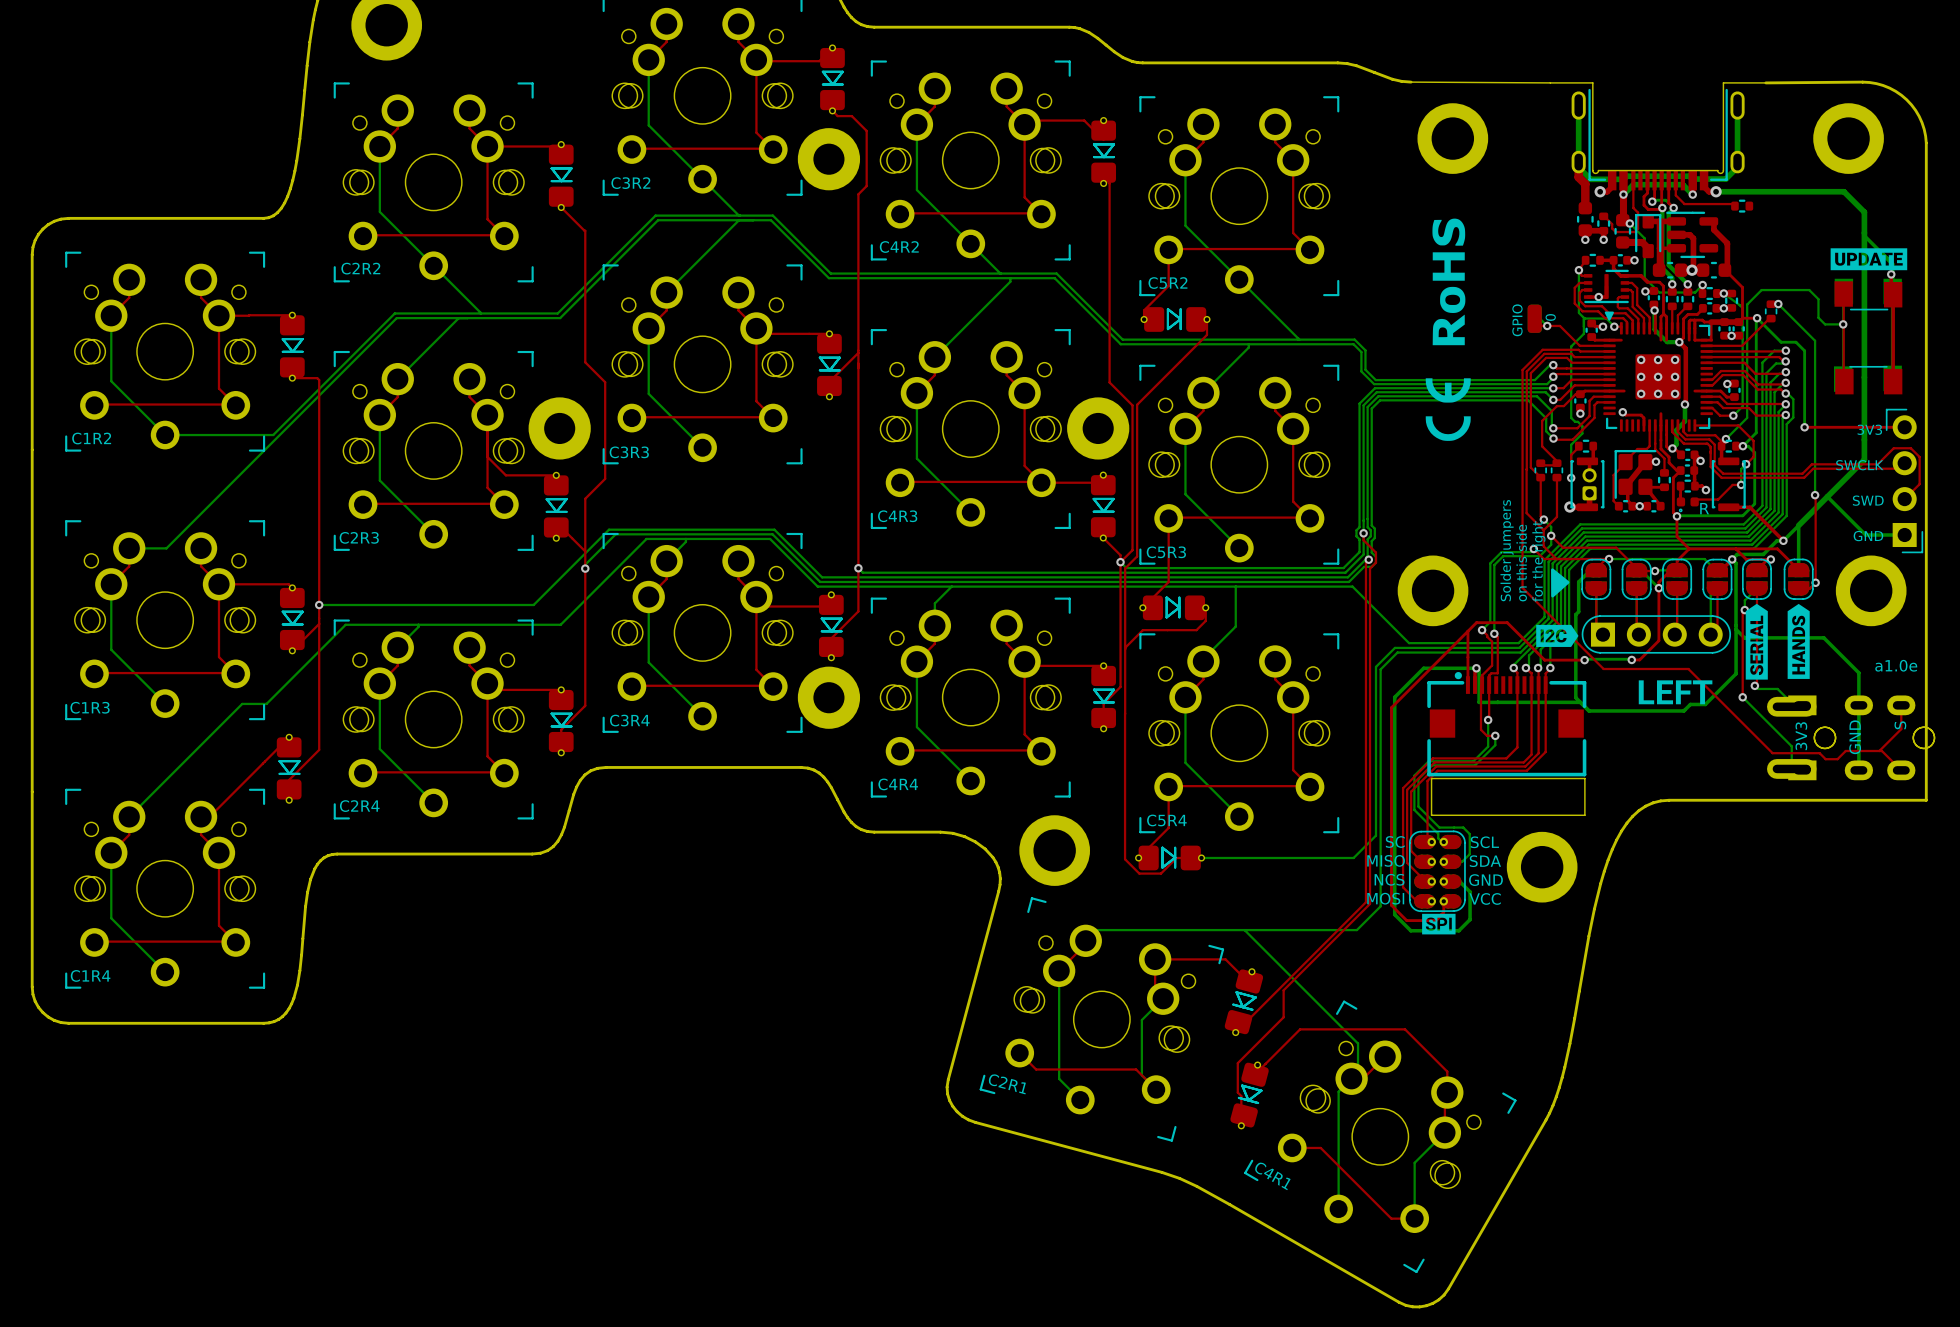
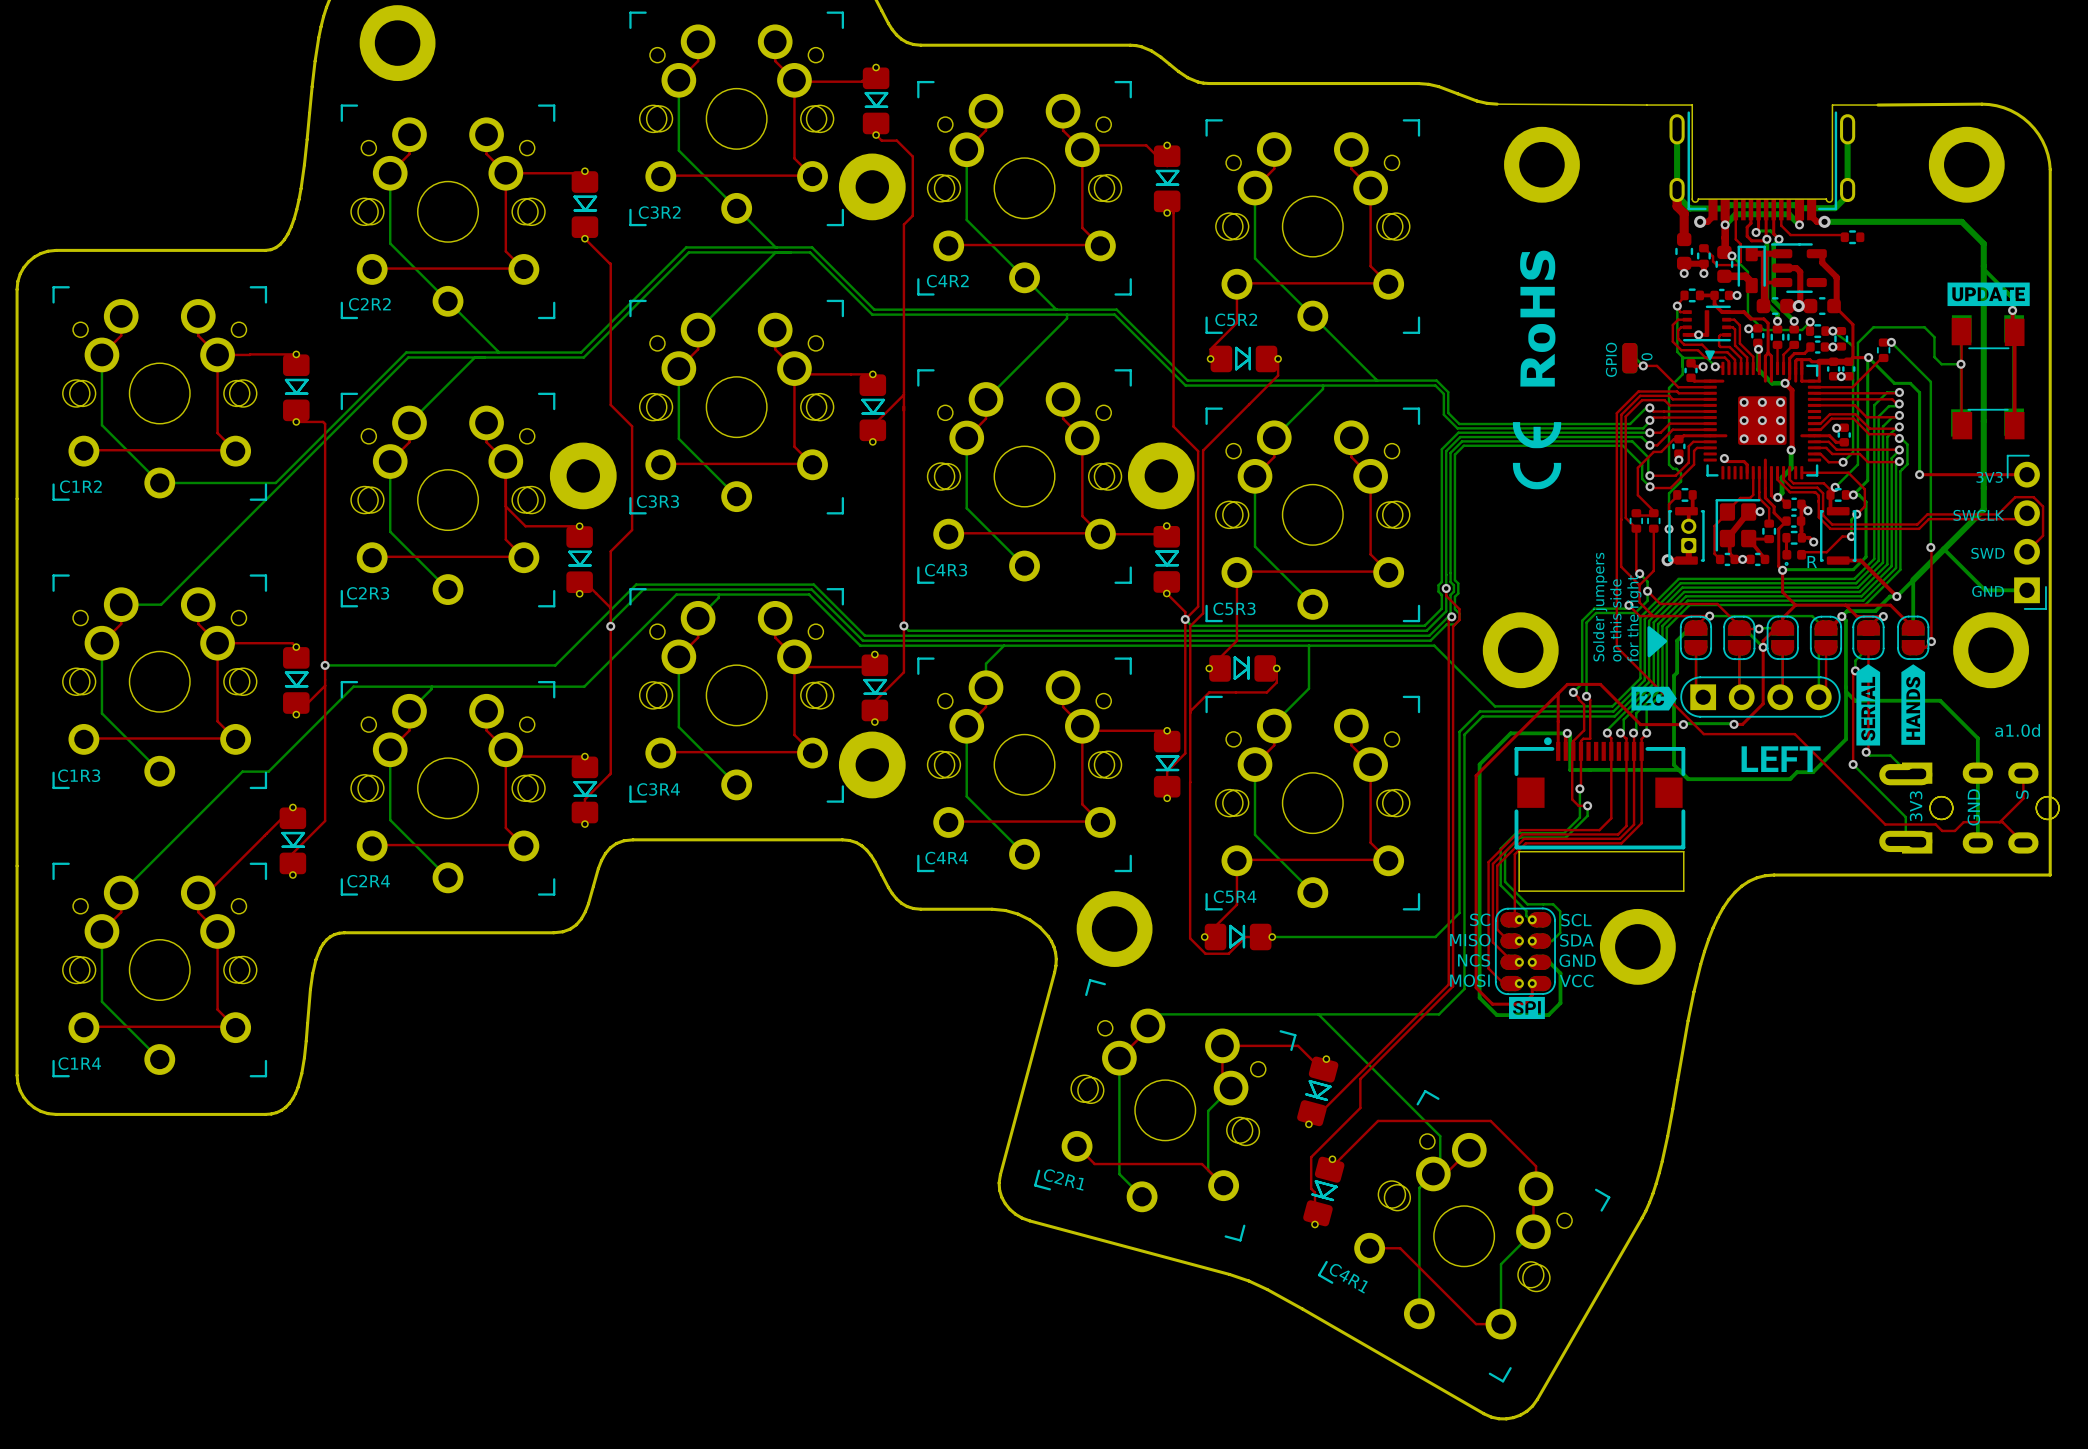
text: a1.0e (1896, 665) -> a1.0d (2017, 730)

